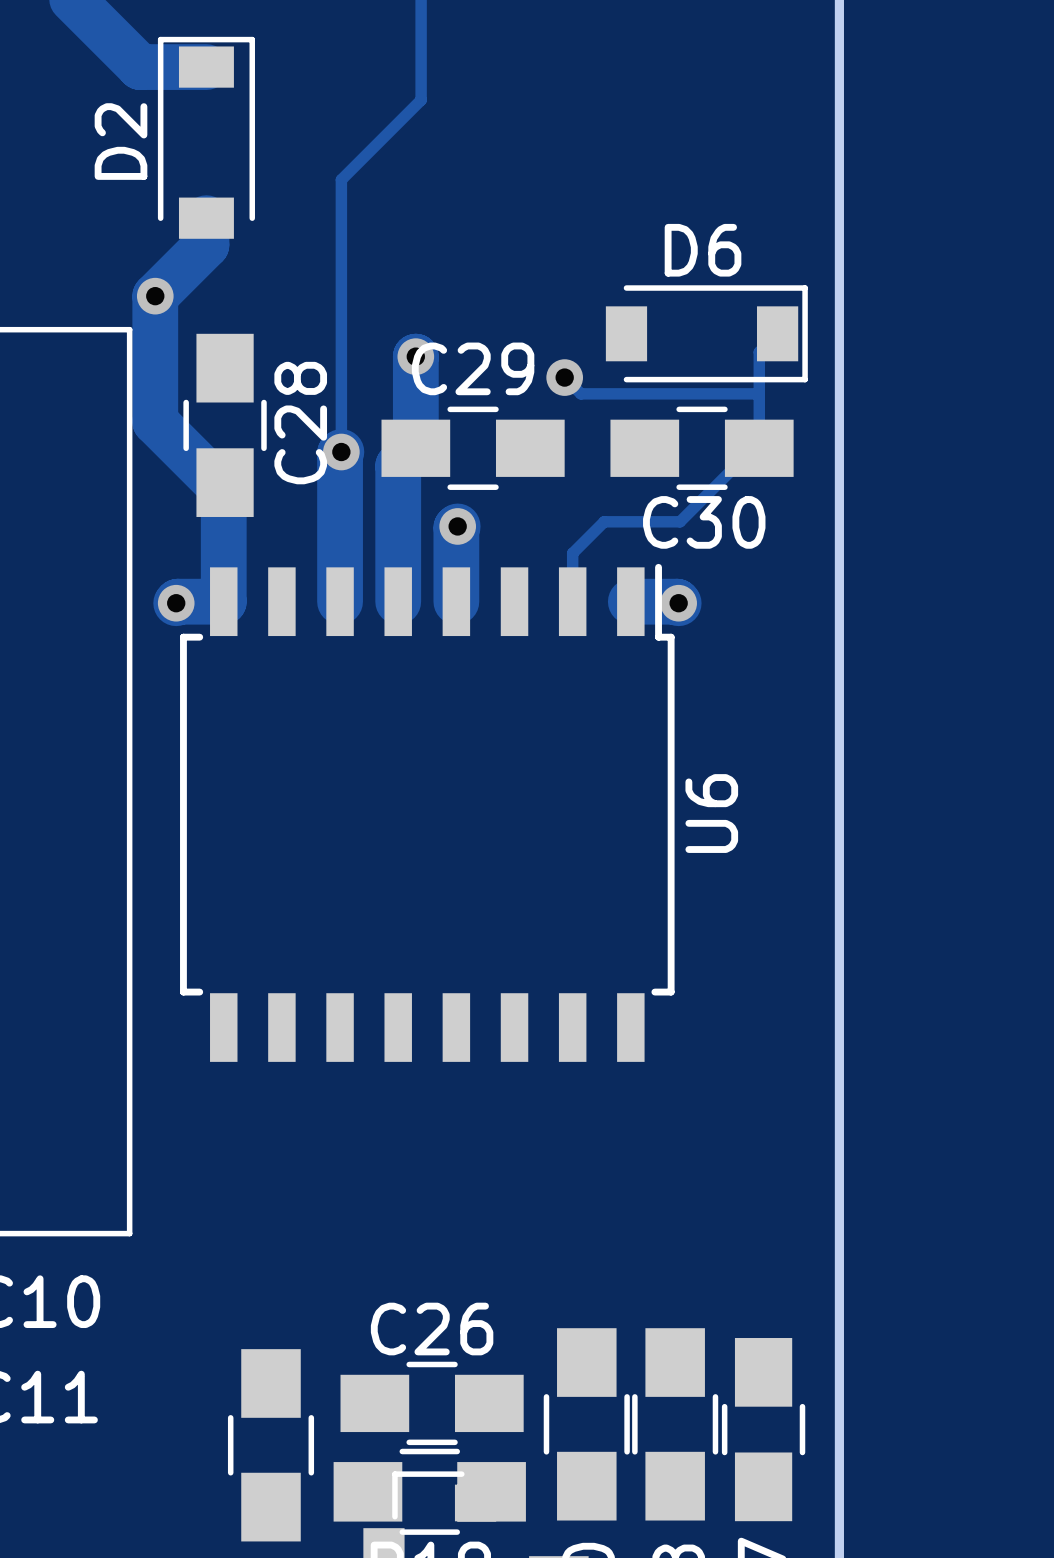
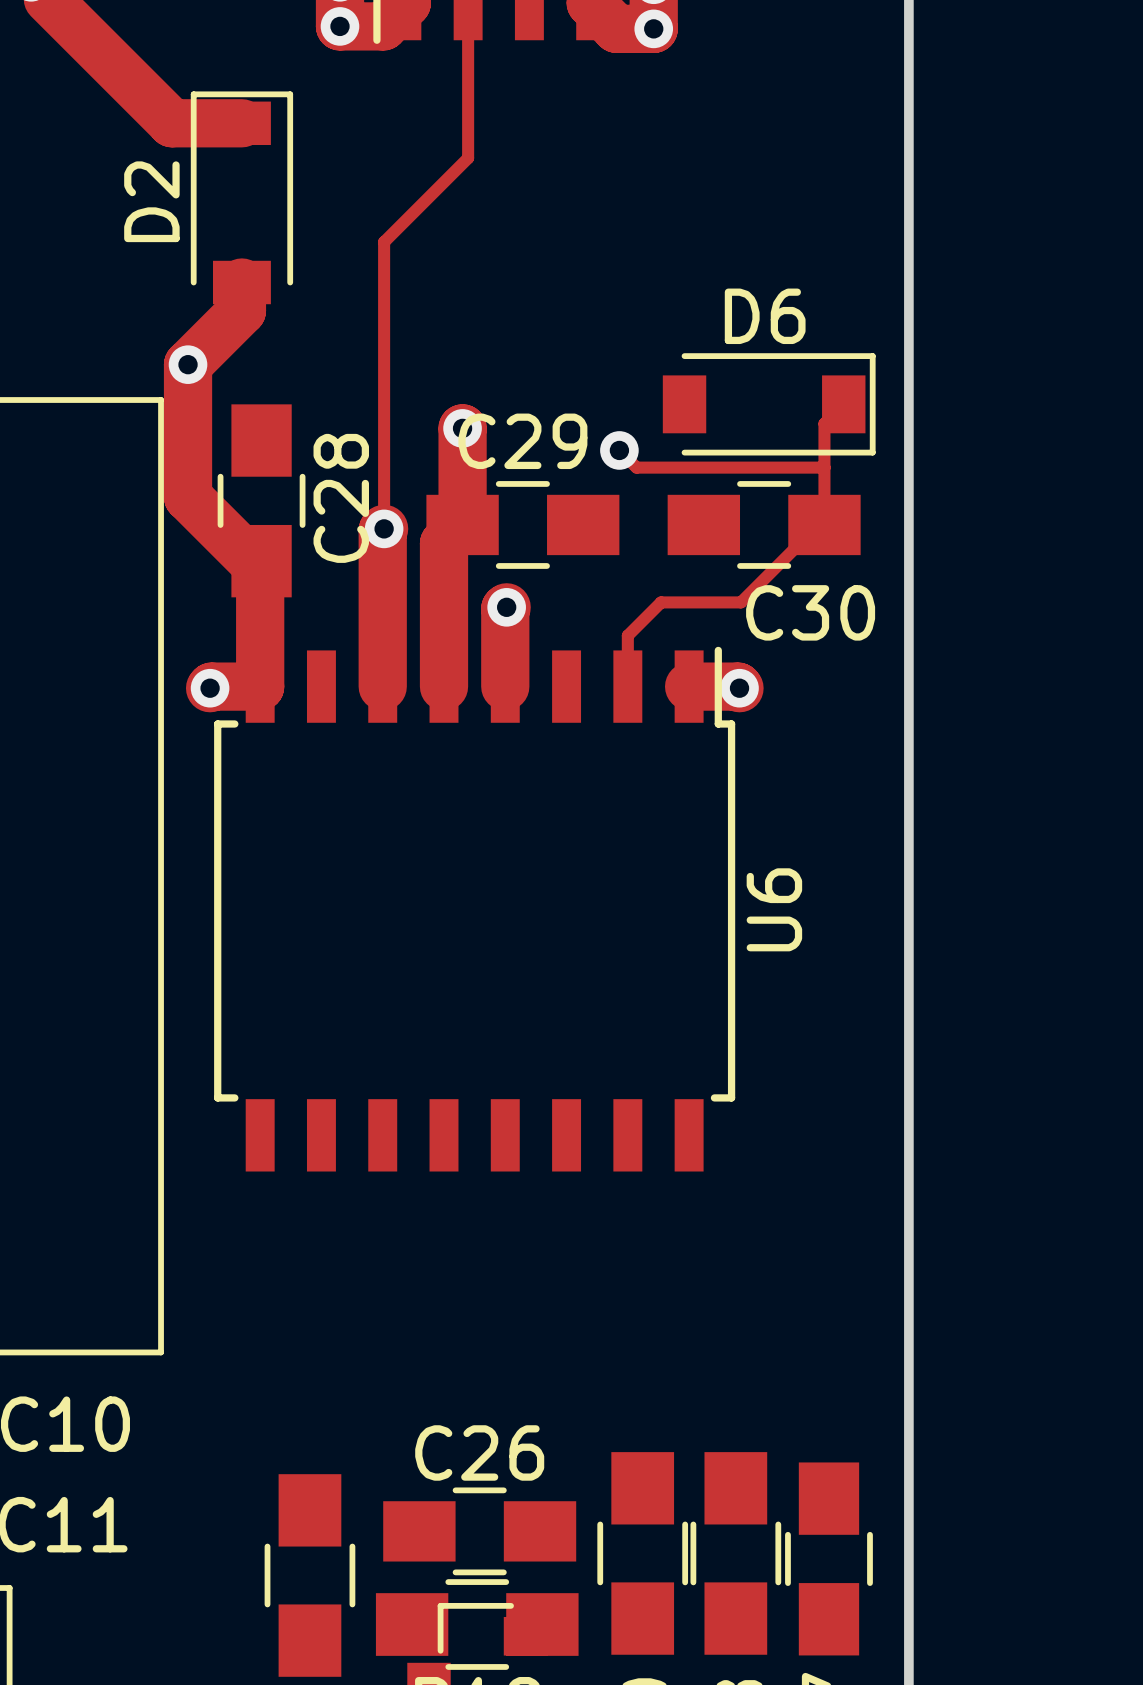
C30 name position: C30 (704, 522) -> C30 (810, 612)

